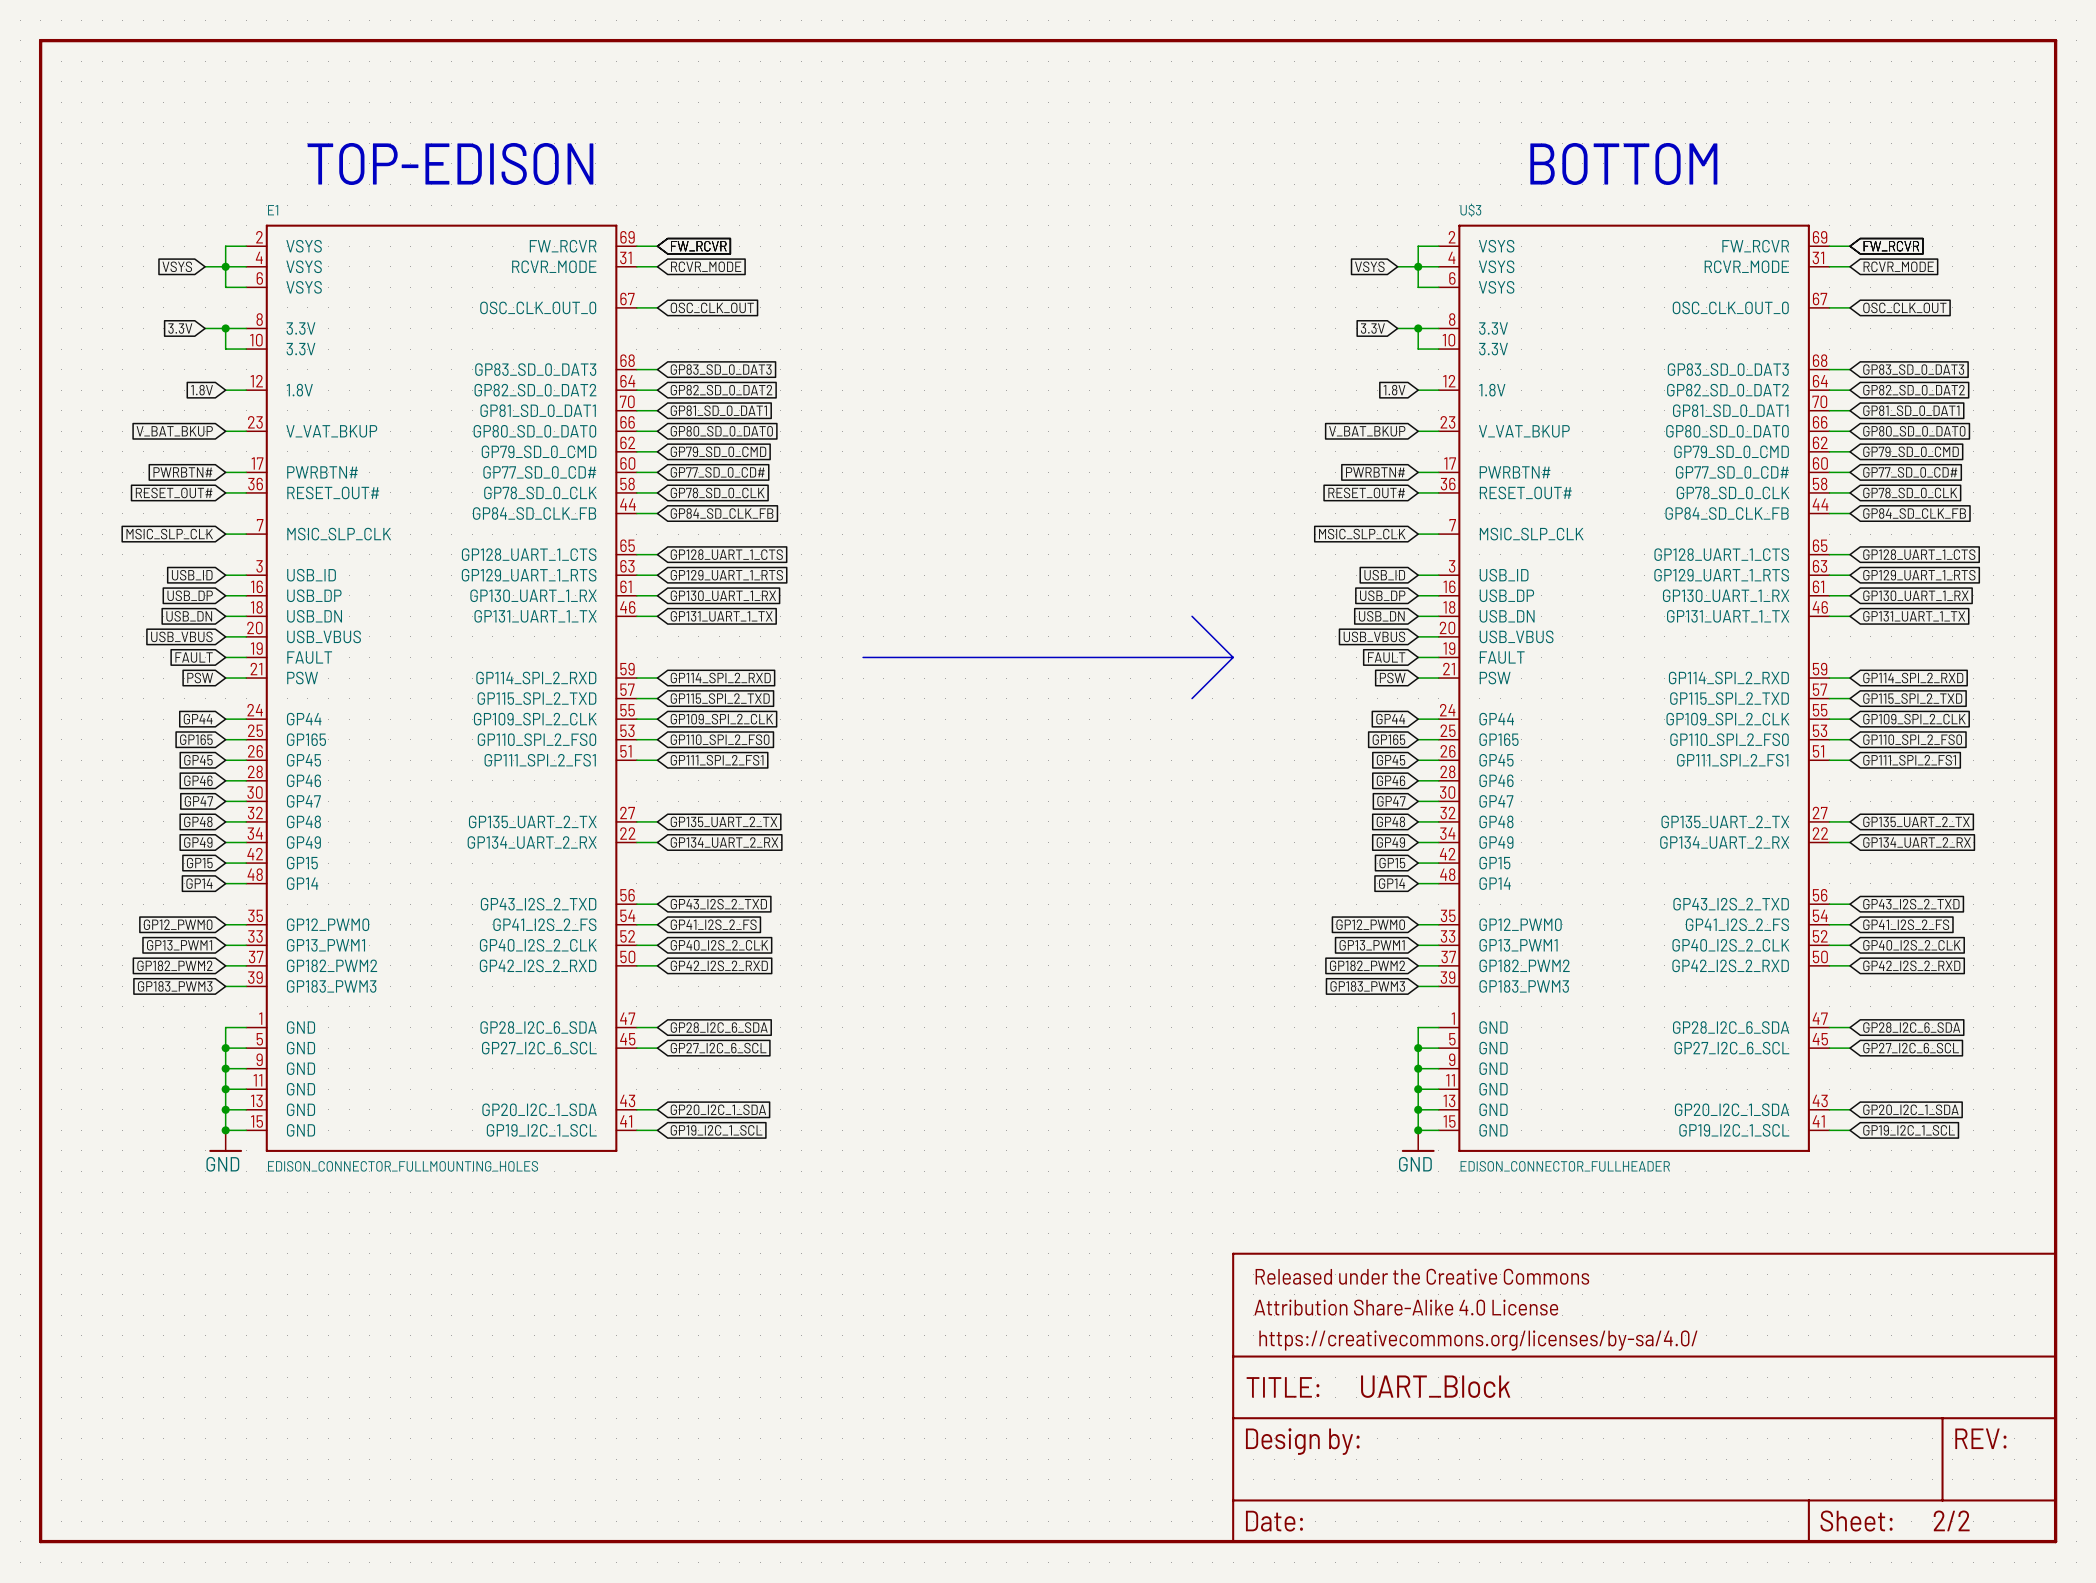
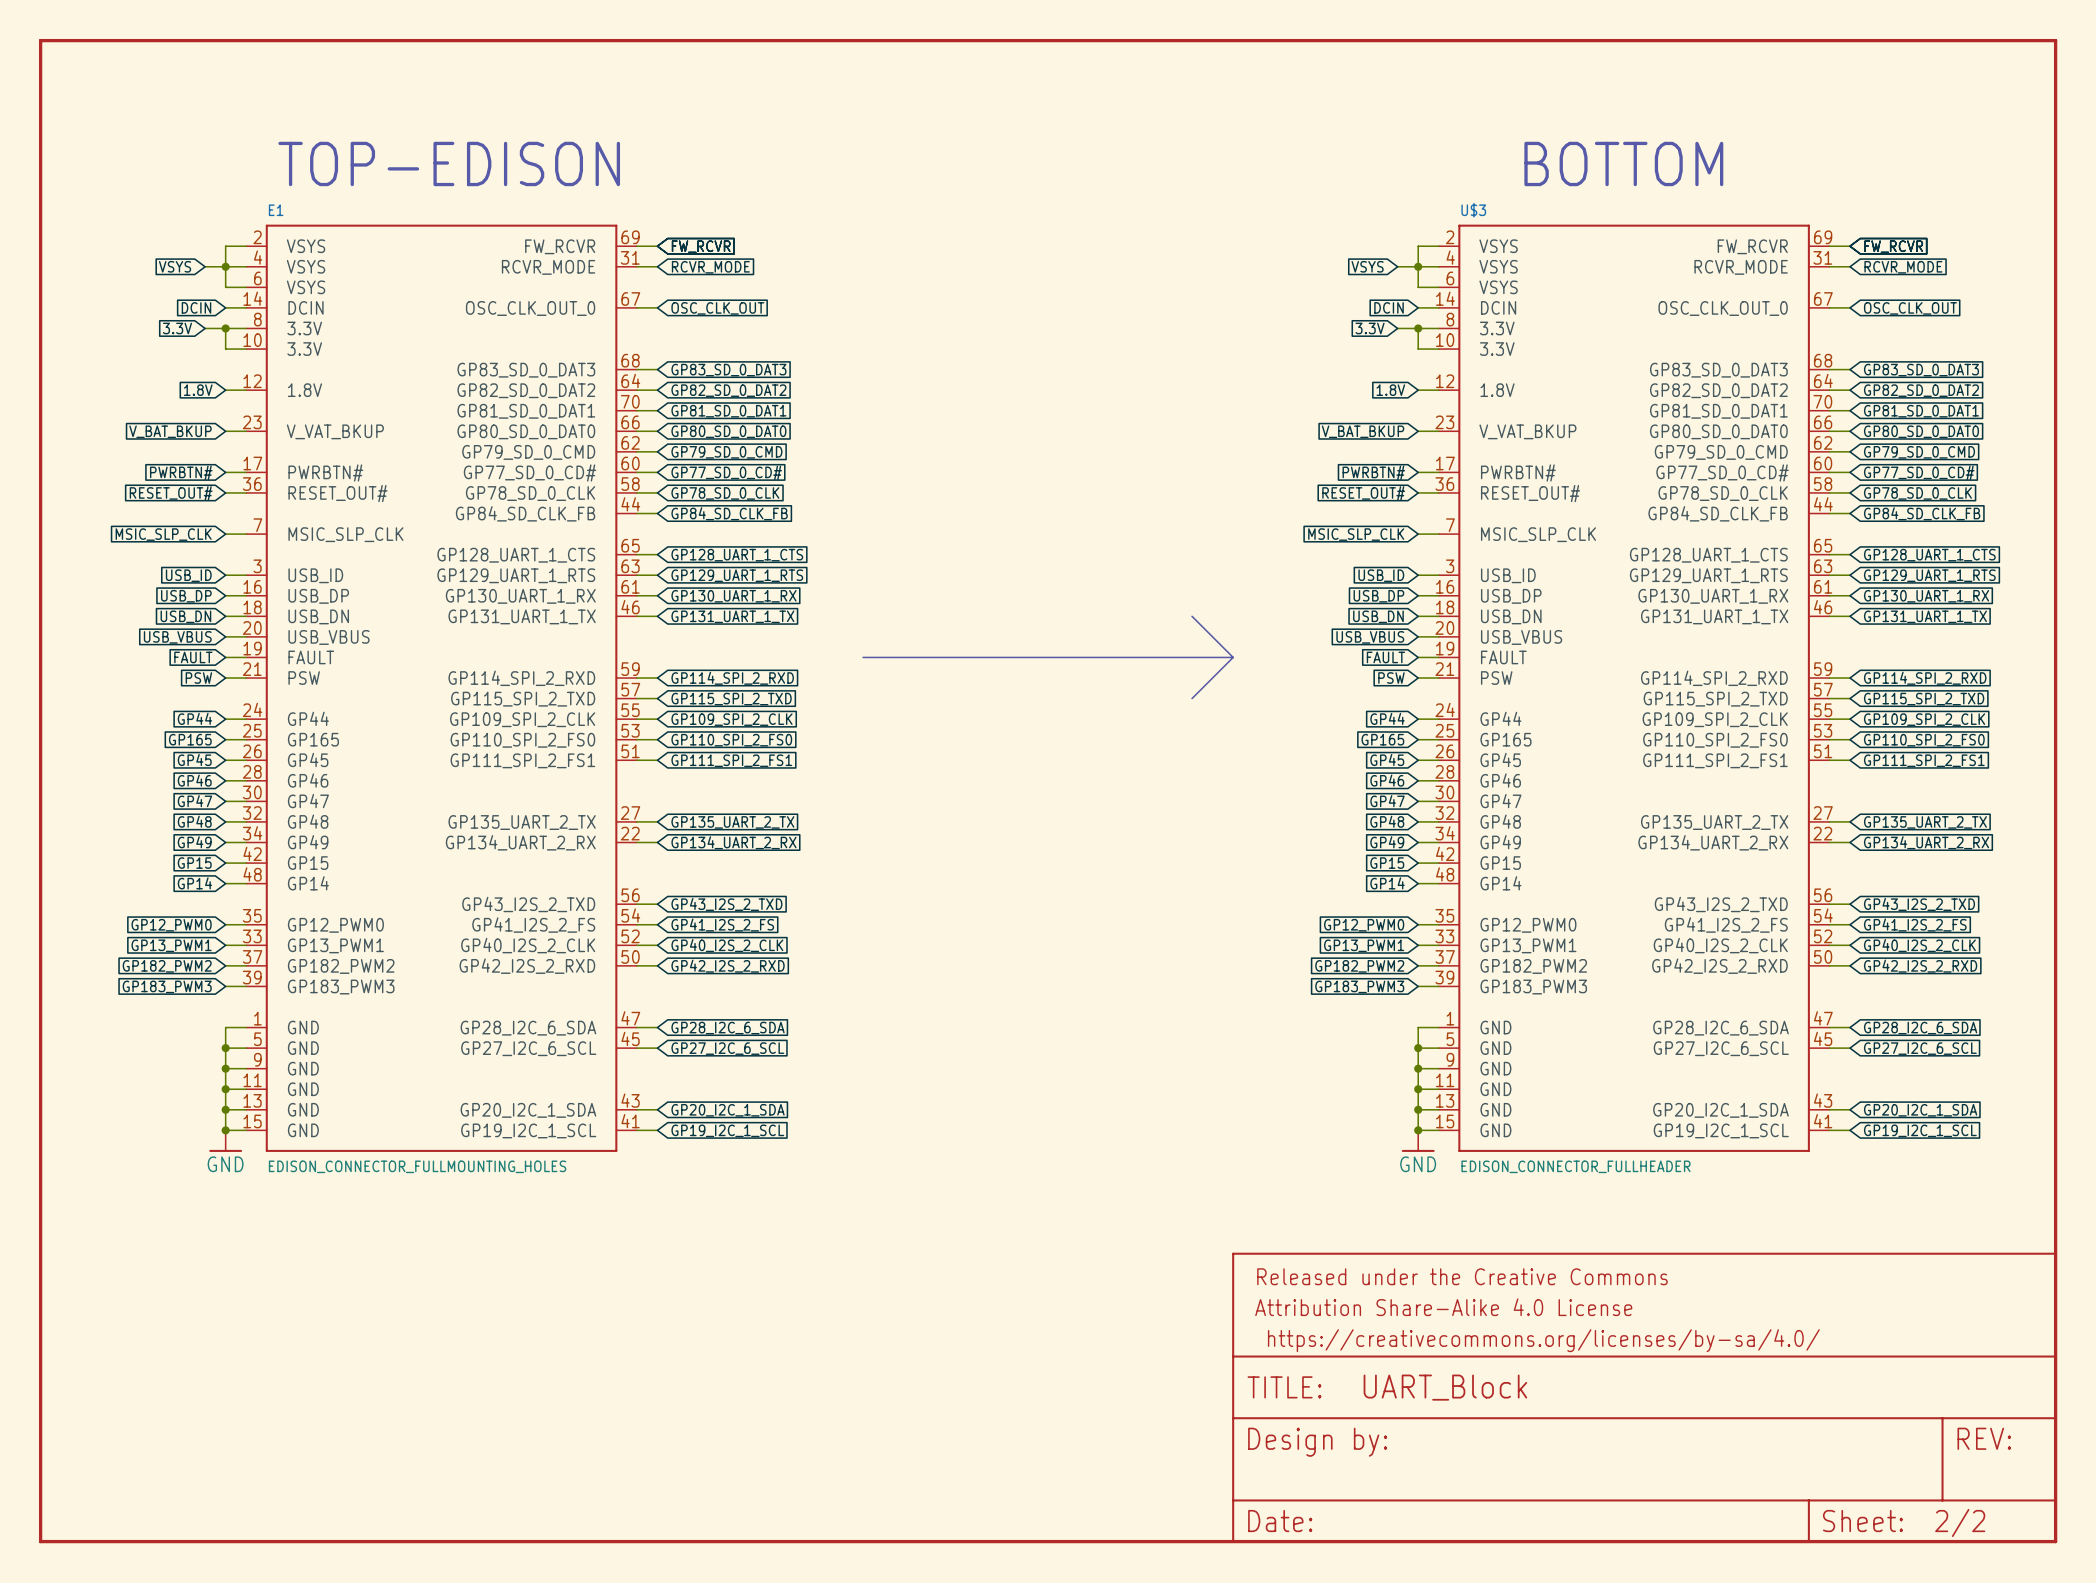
E1 symbol: [246, 224, 637, 1152] -> [246, 224, 637, 1152]
U$3 symbol: [1438, 224, 1830, 1152] -> [1438, 224, 1830, 1152]
global label: none -> DCIN (196, 307)
wire: none -> (225, 307) (246, 307)
global label: none -> DCIN (1389, 307)
wire: none -> (1418, 307) (1438, 307)

